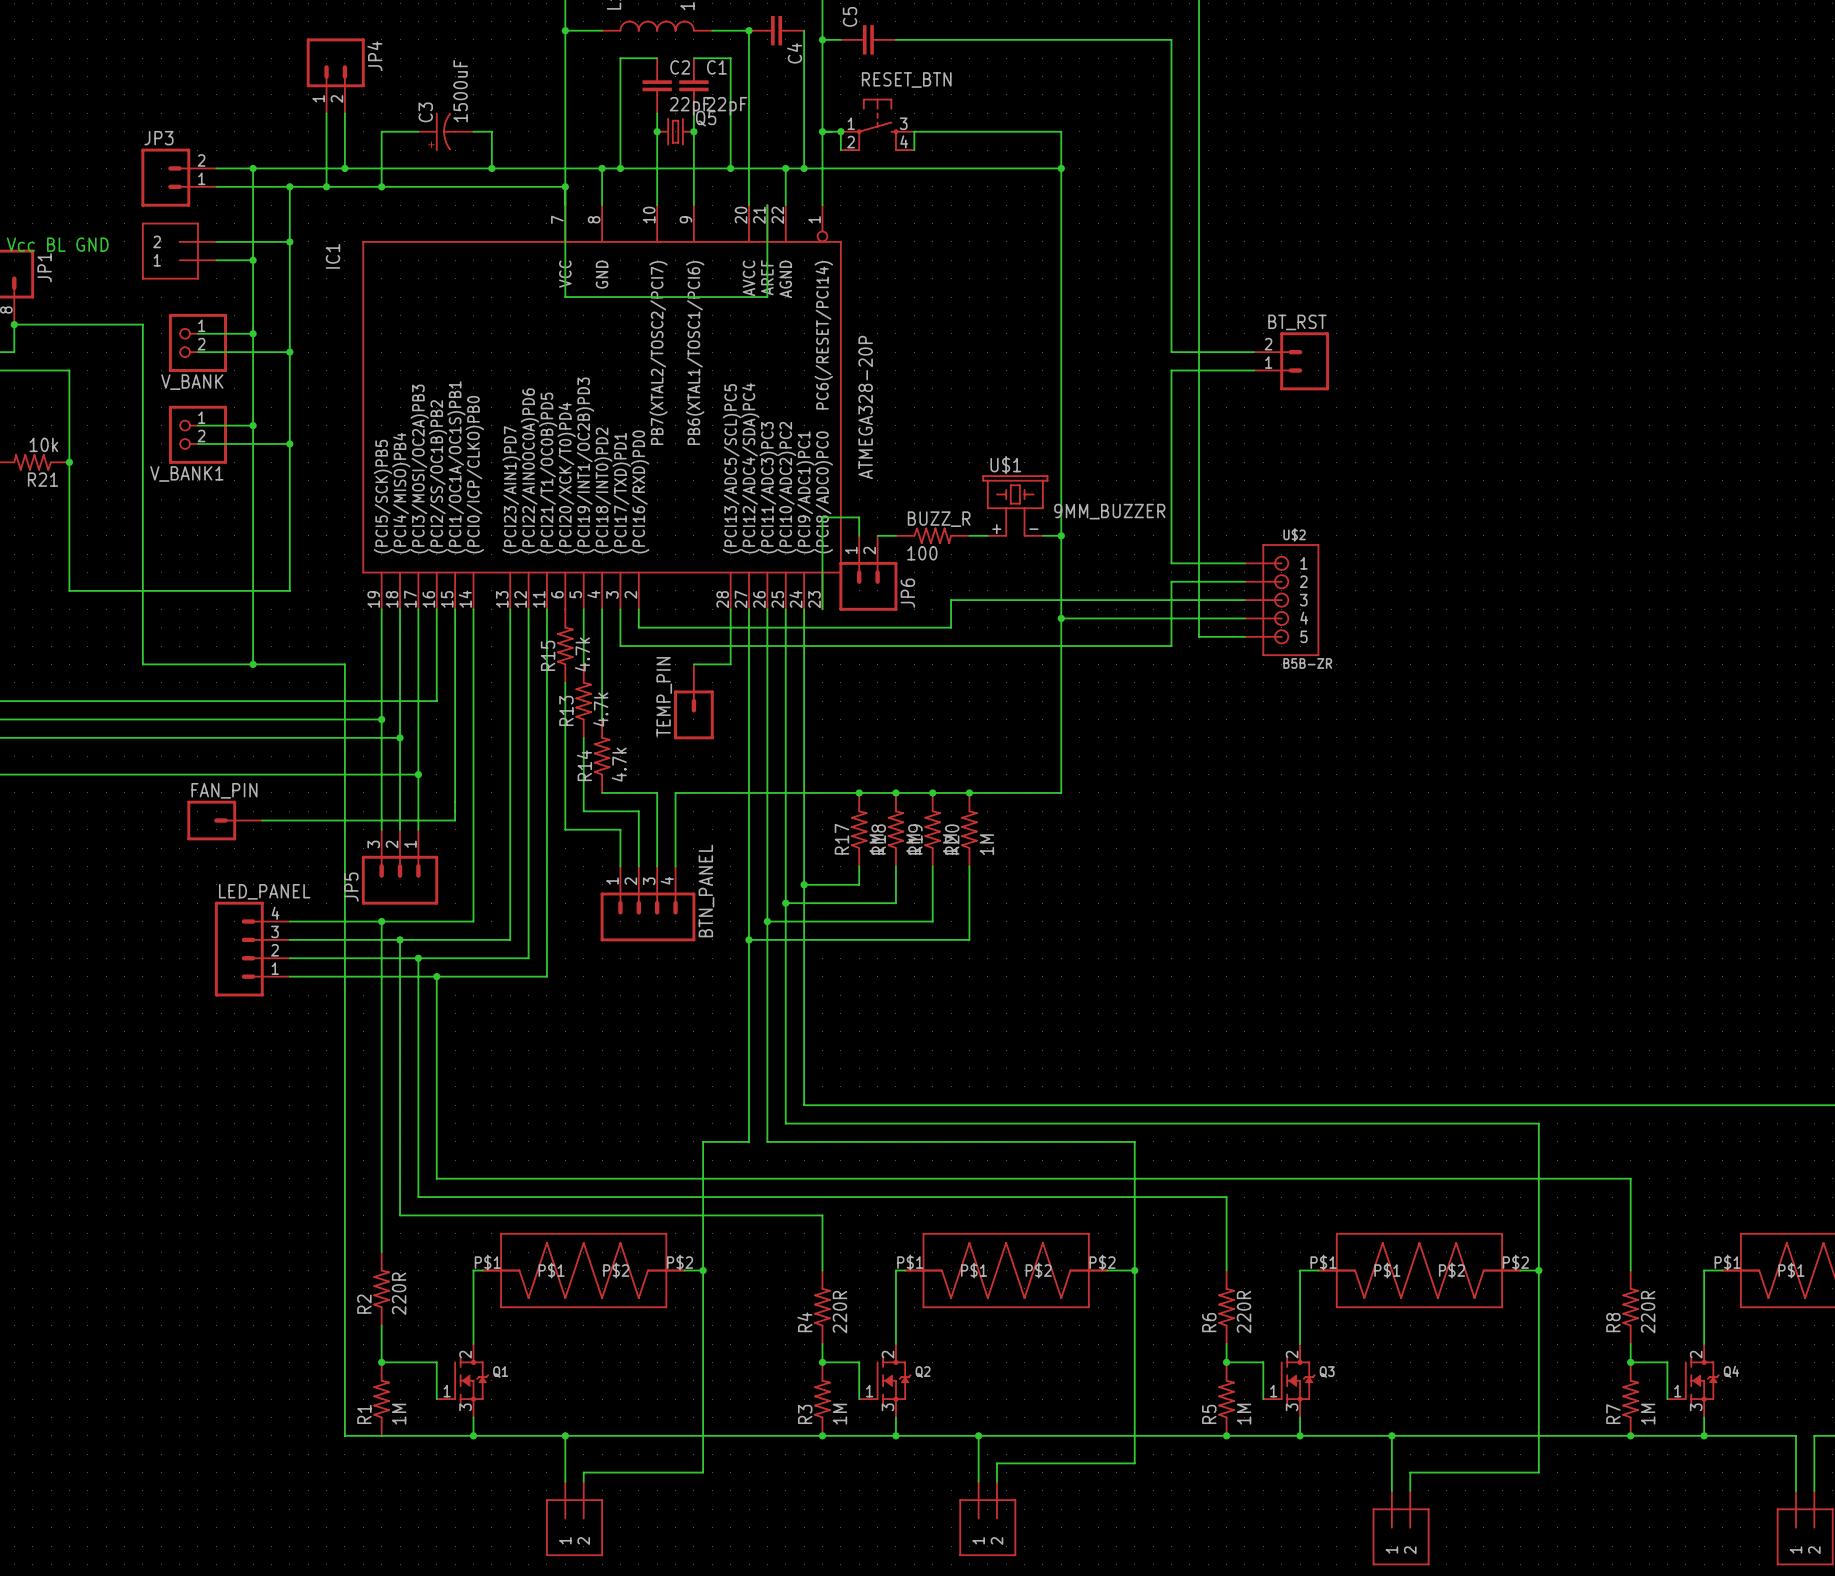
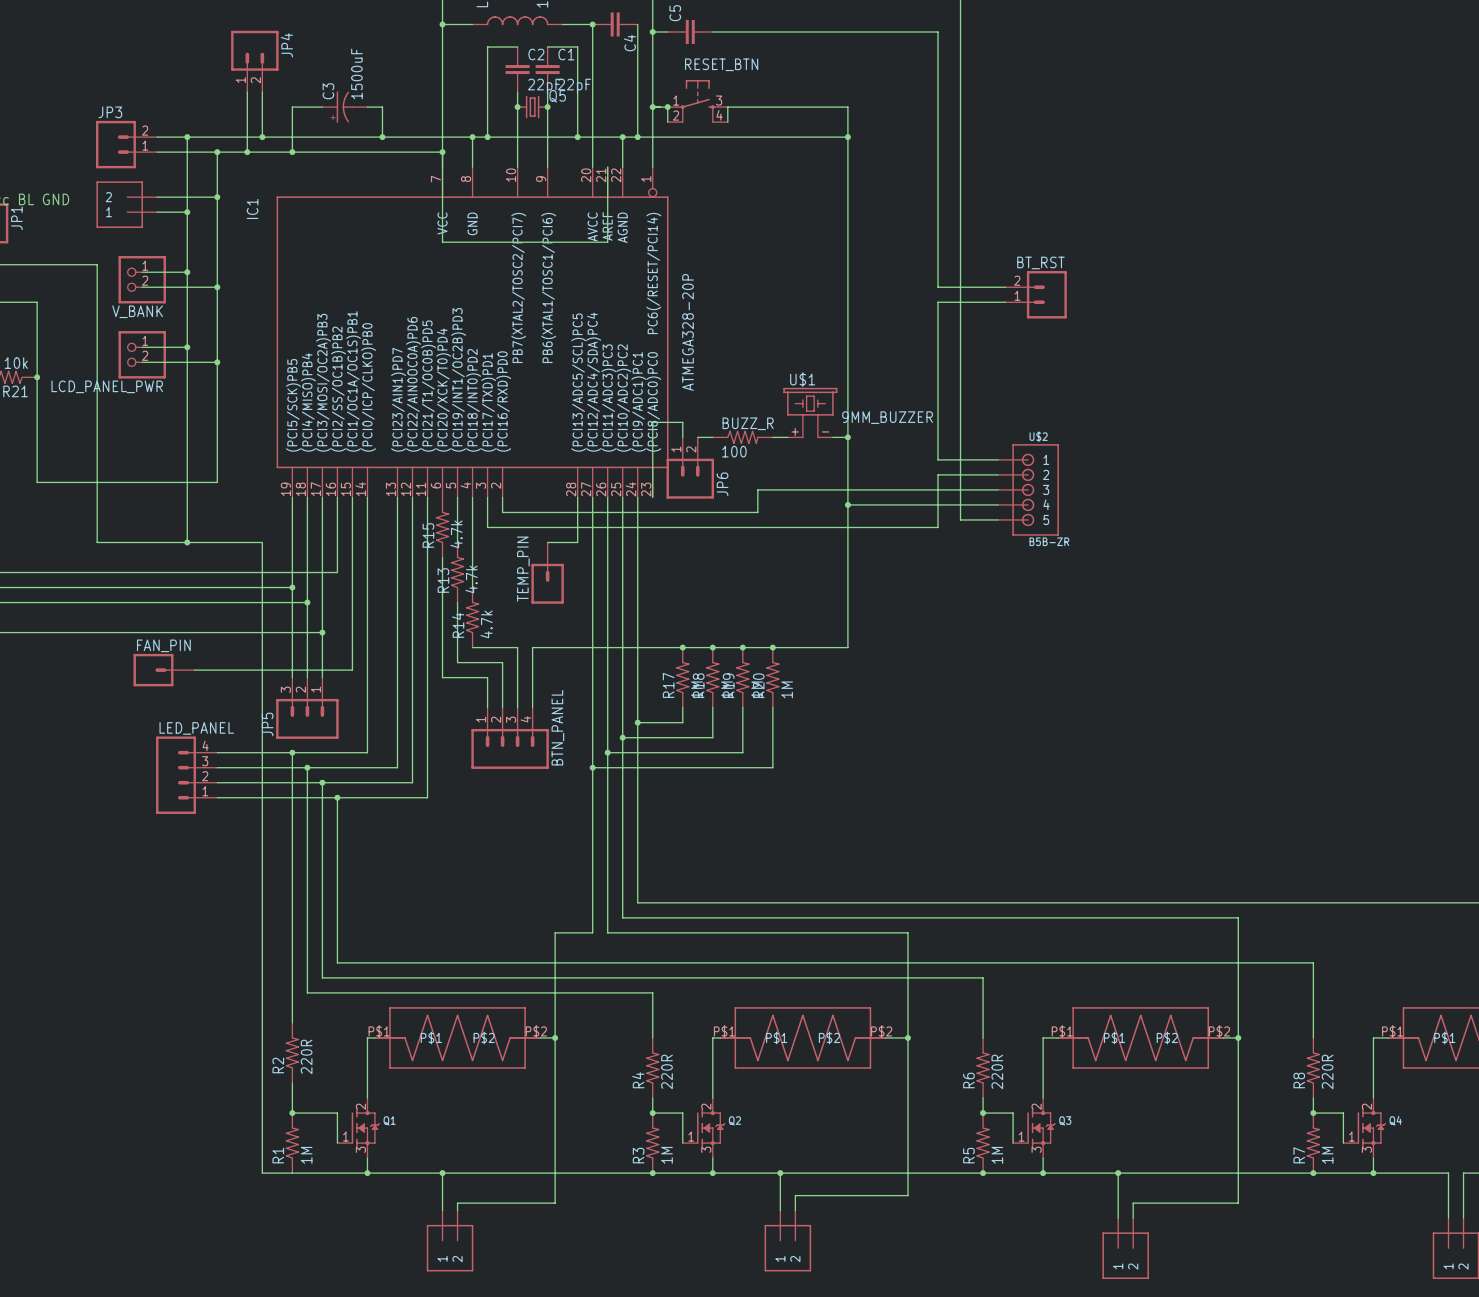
V_BANK1 name: V_BANK1 (186, 473) -> LCD_PANEL_PWR (107, 386)

